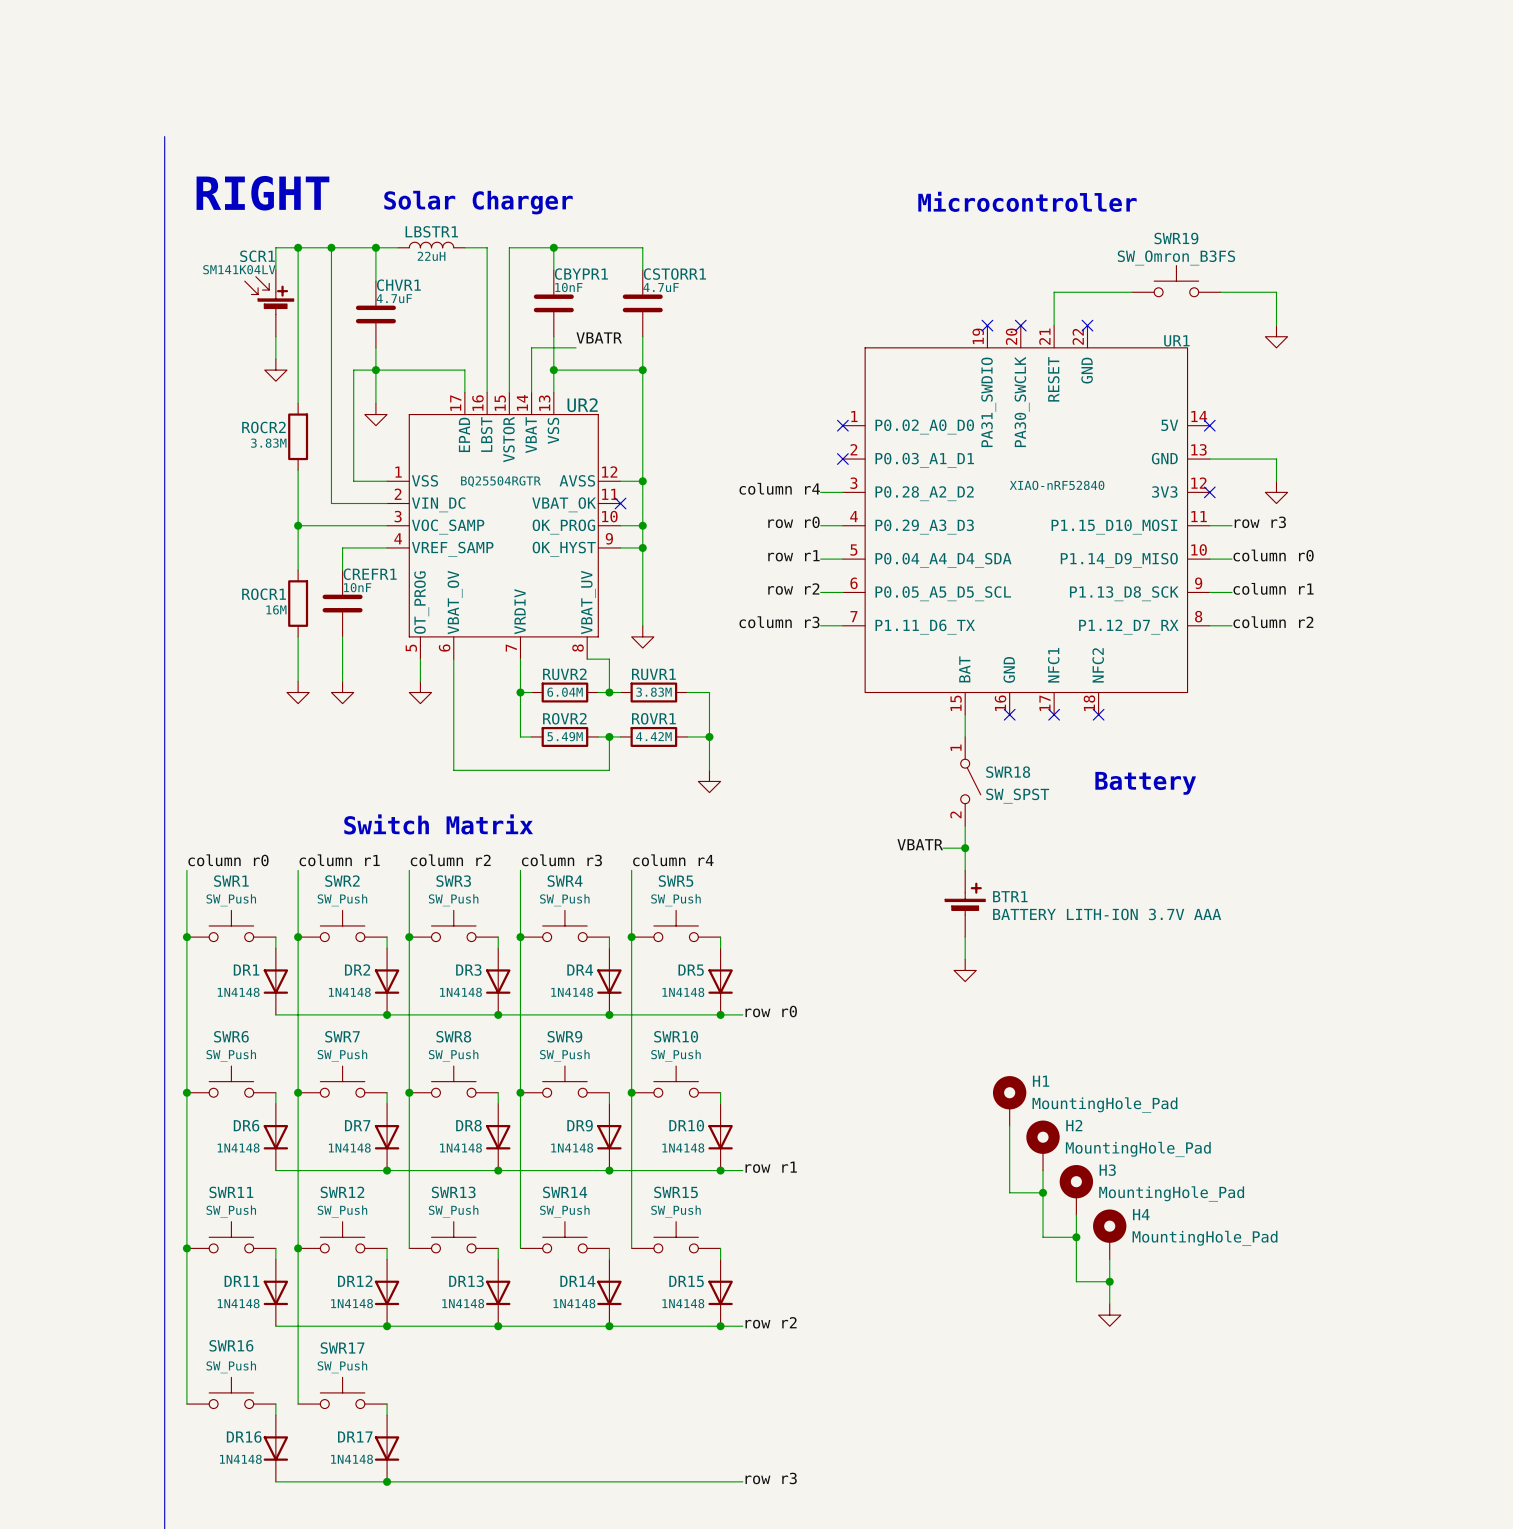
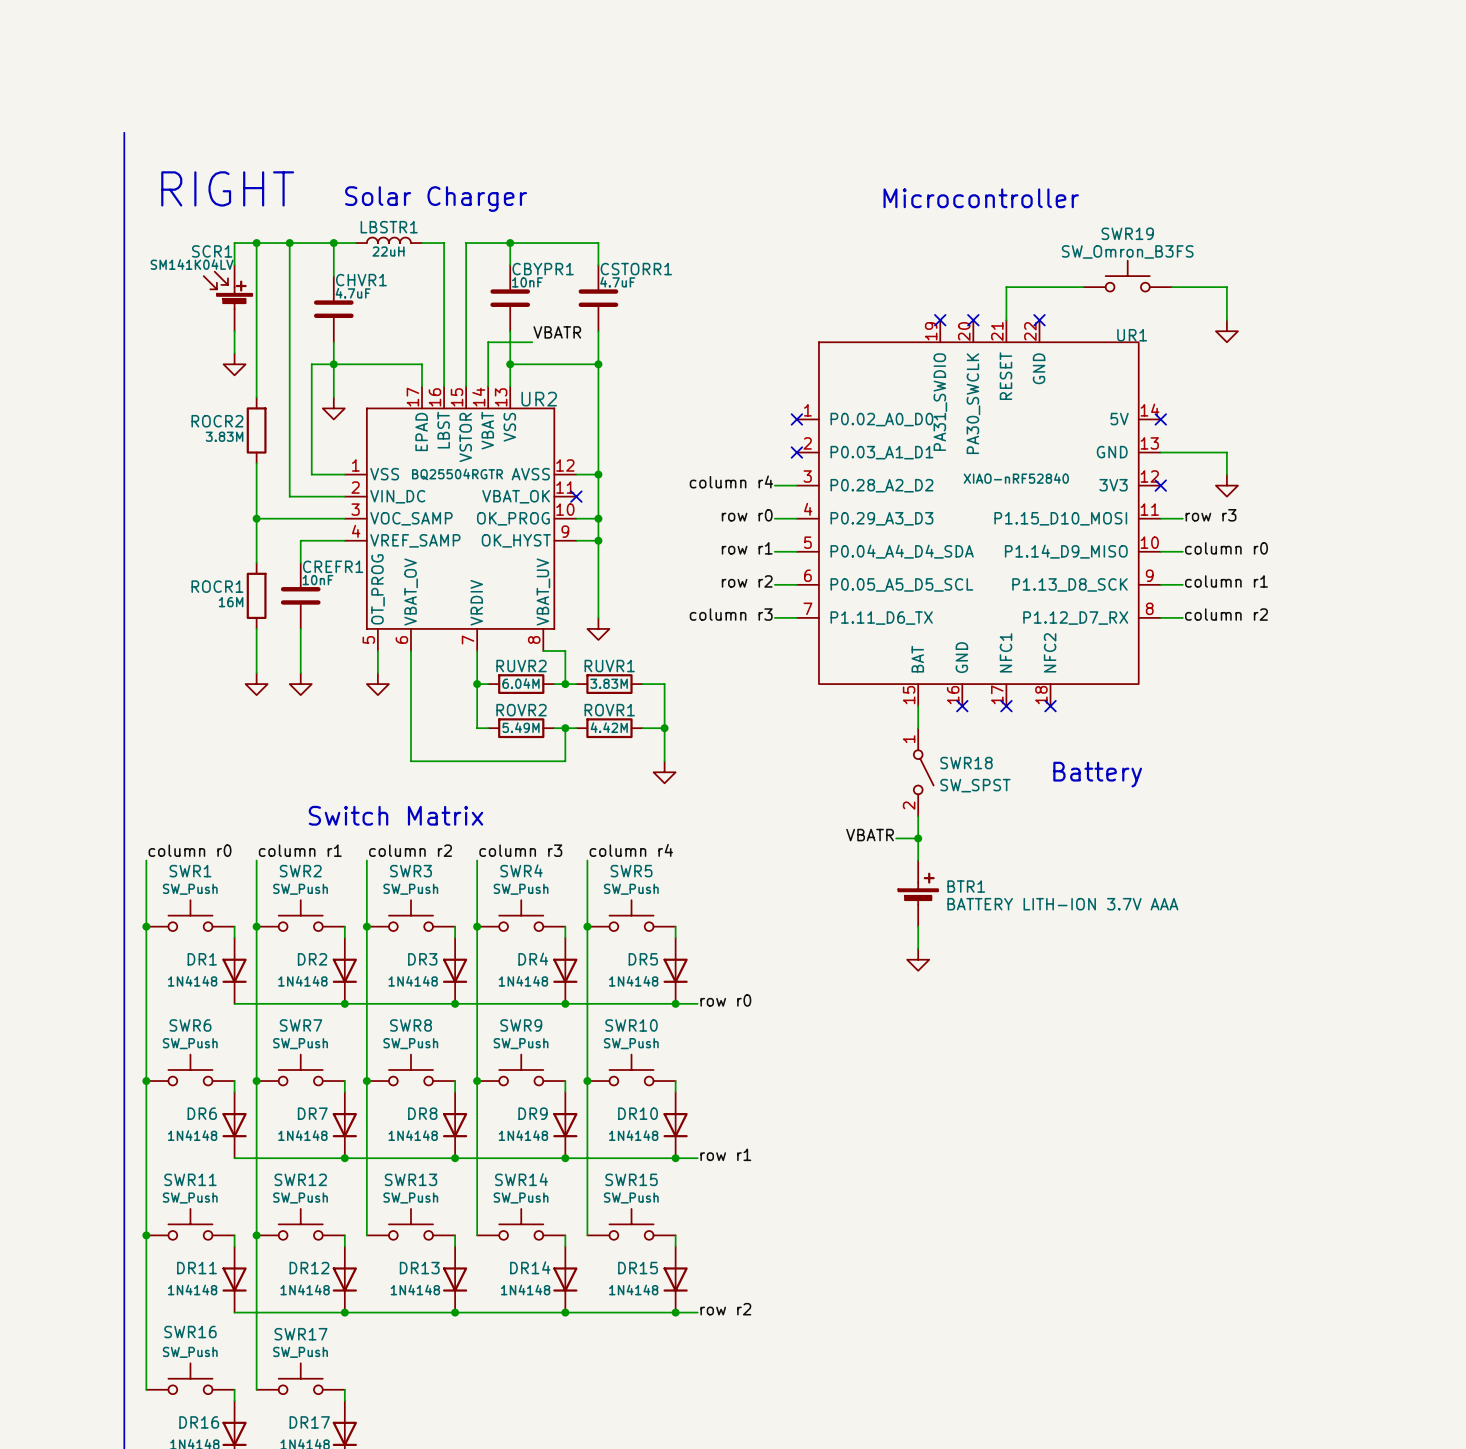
H1: MountingHole_Pad (1009, 1101) -> none
wire: (1009, 1126) (1009, 1192) (1043, 1192) -> none
H2: MountingHole_Pad (1043, 1145) -> none
wire: (1043, 1170) (1043, 1237) (1076, 1237) -> none
H3: MountingHole_Pad (1076, 1190) -> none
junction: (1043, 1192) -> none
wire: (1076, 1215) (1076, 1281) (1109, 1281) -> none
H4: MountingHole_Pad (1109, 1234) -> none
junction: (1076, 1237) -> none
wire: (1109, 1259) (1109, 1303) -> none
junction: (1109, 1281) -> none
power symbol: (1109, 1315) -> none

